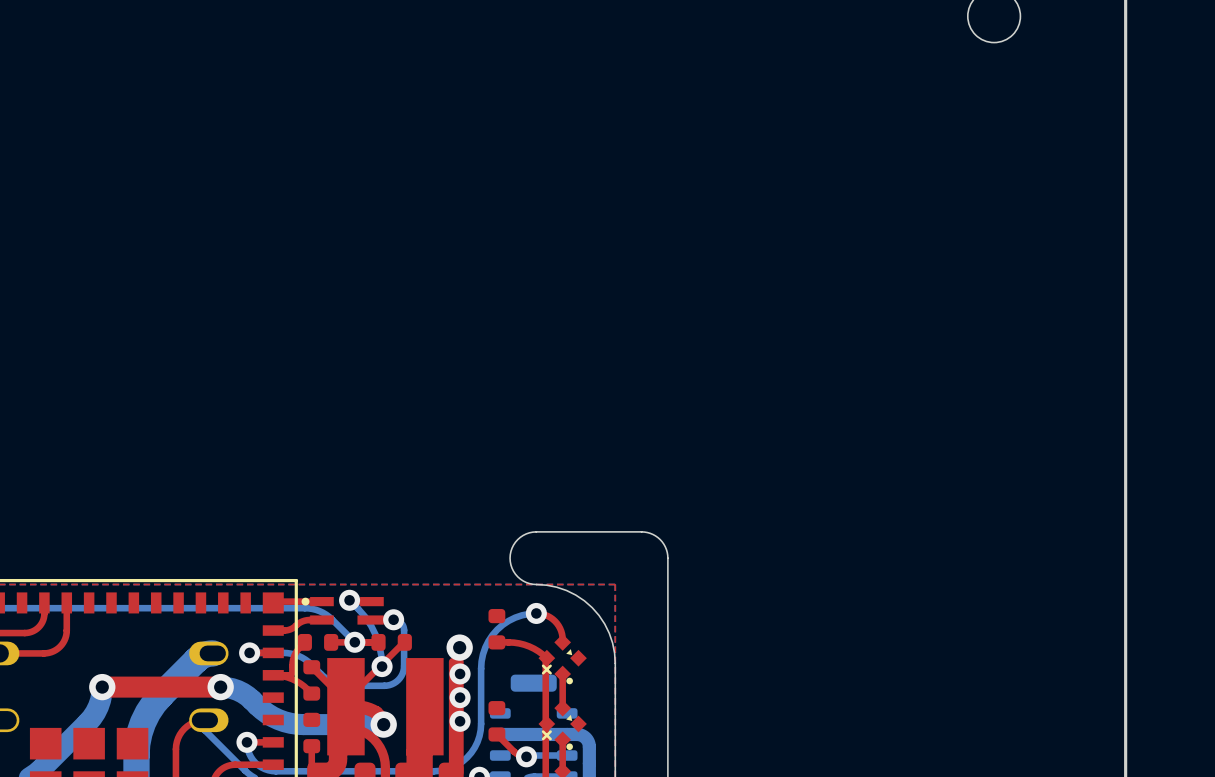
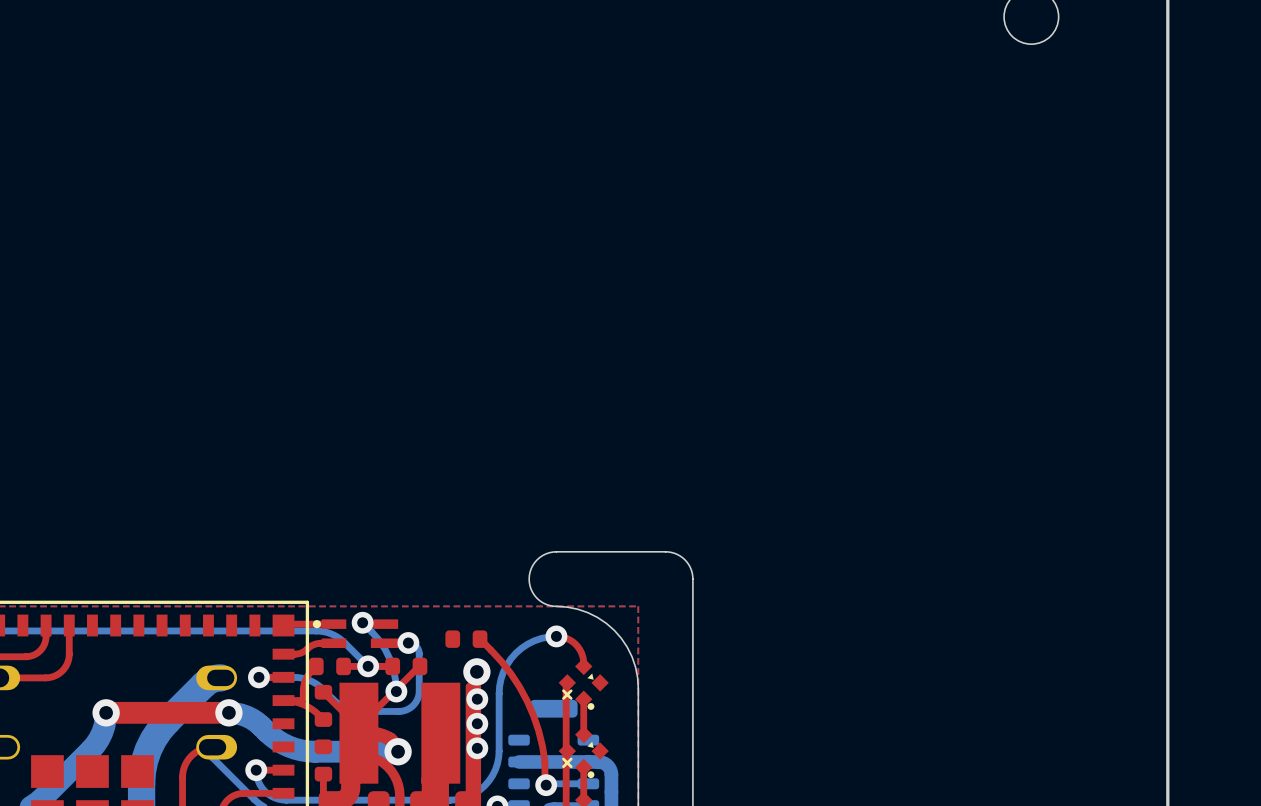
part rotation: 0° (496, 629) -> 90° clockwise (466, 639)
part position: (496, 629) -> (466, 639)
top track: (496, 642) (524, 644) (538, 651) (546, 658) -> none
part: (496, 721) -> none
top track: (496, 734) (515, 752) (526, 756) -> (480, 639) (511, 673) (527, 701) (542, 745) (546, 785)

